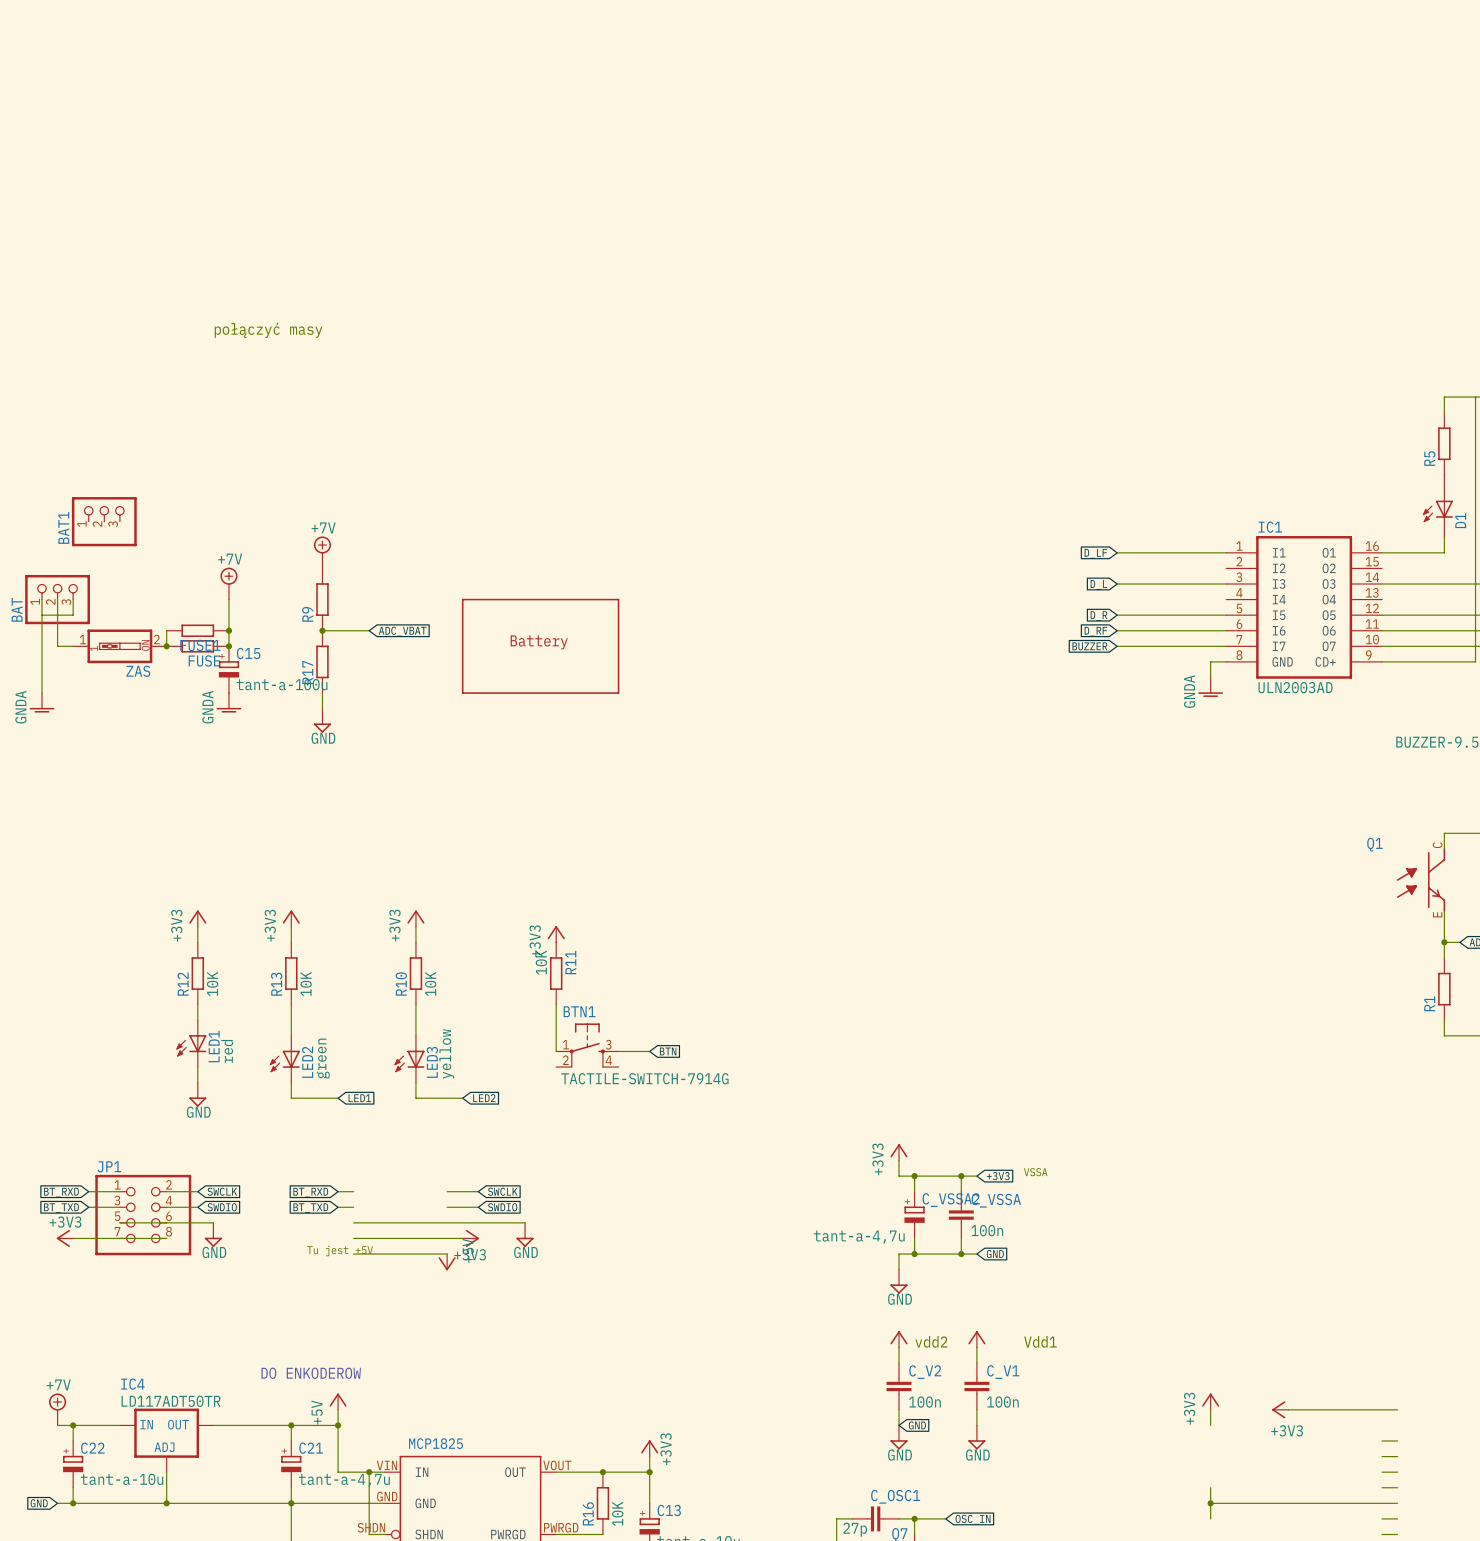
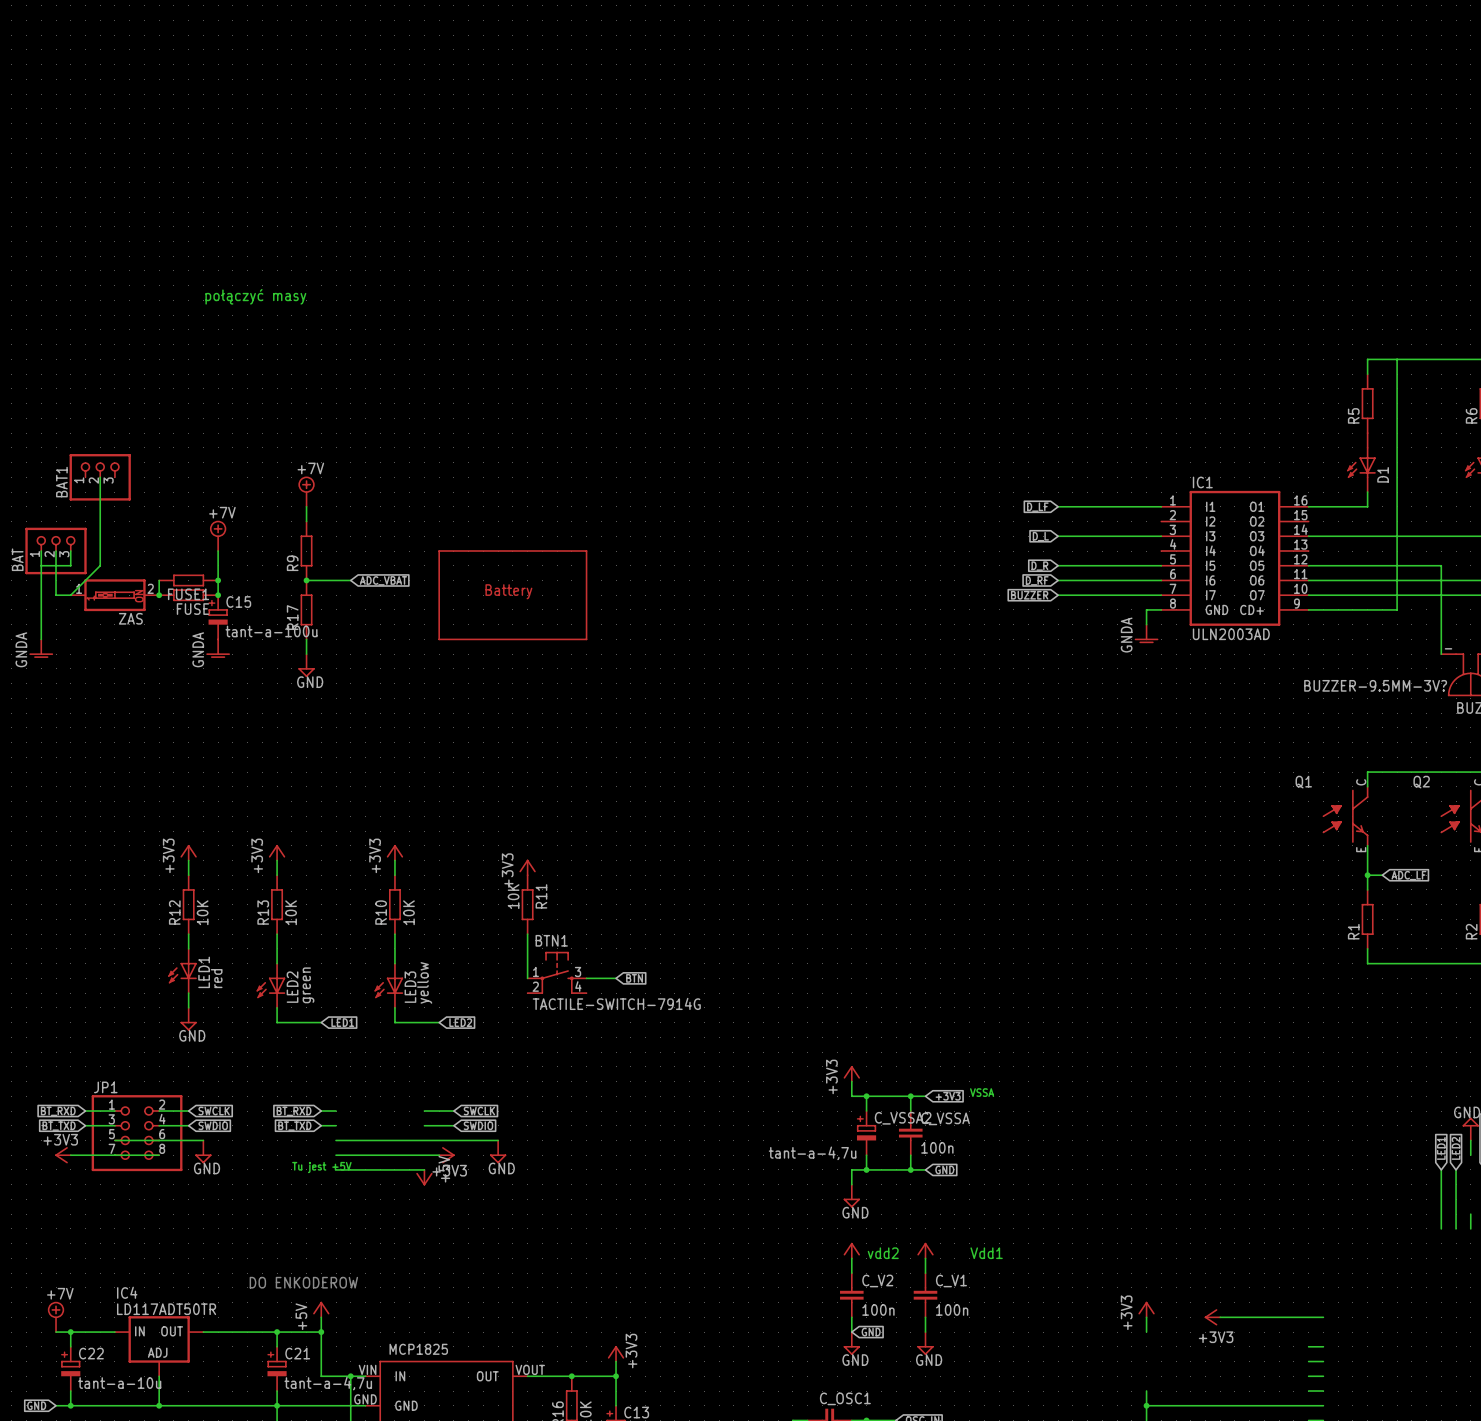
wire: none -> (100, 477) (100, 565) (70, 595)
power symbol position: +7V (322, 552) -> +7V (306, 491)

